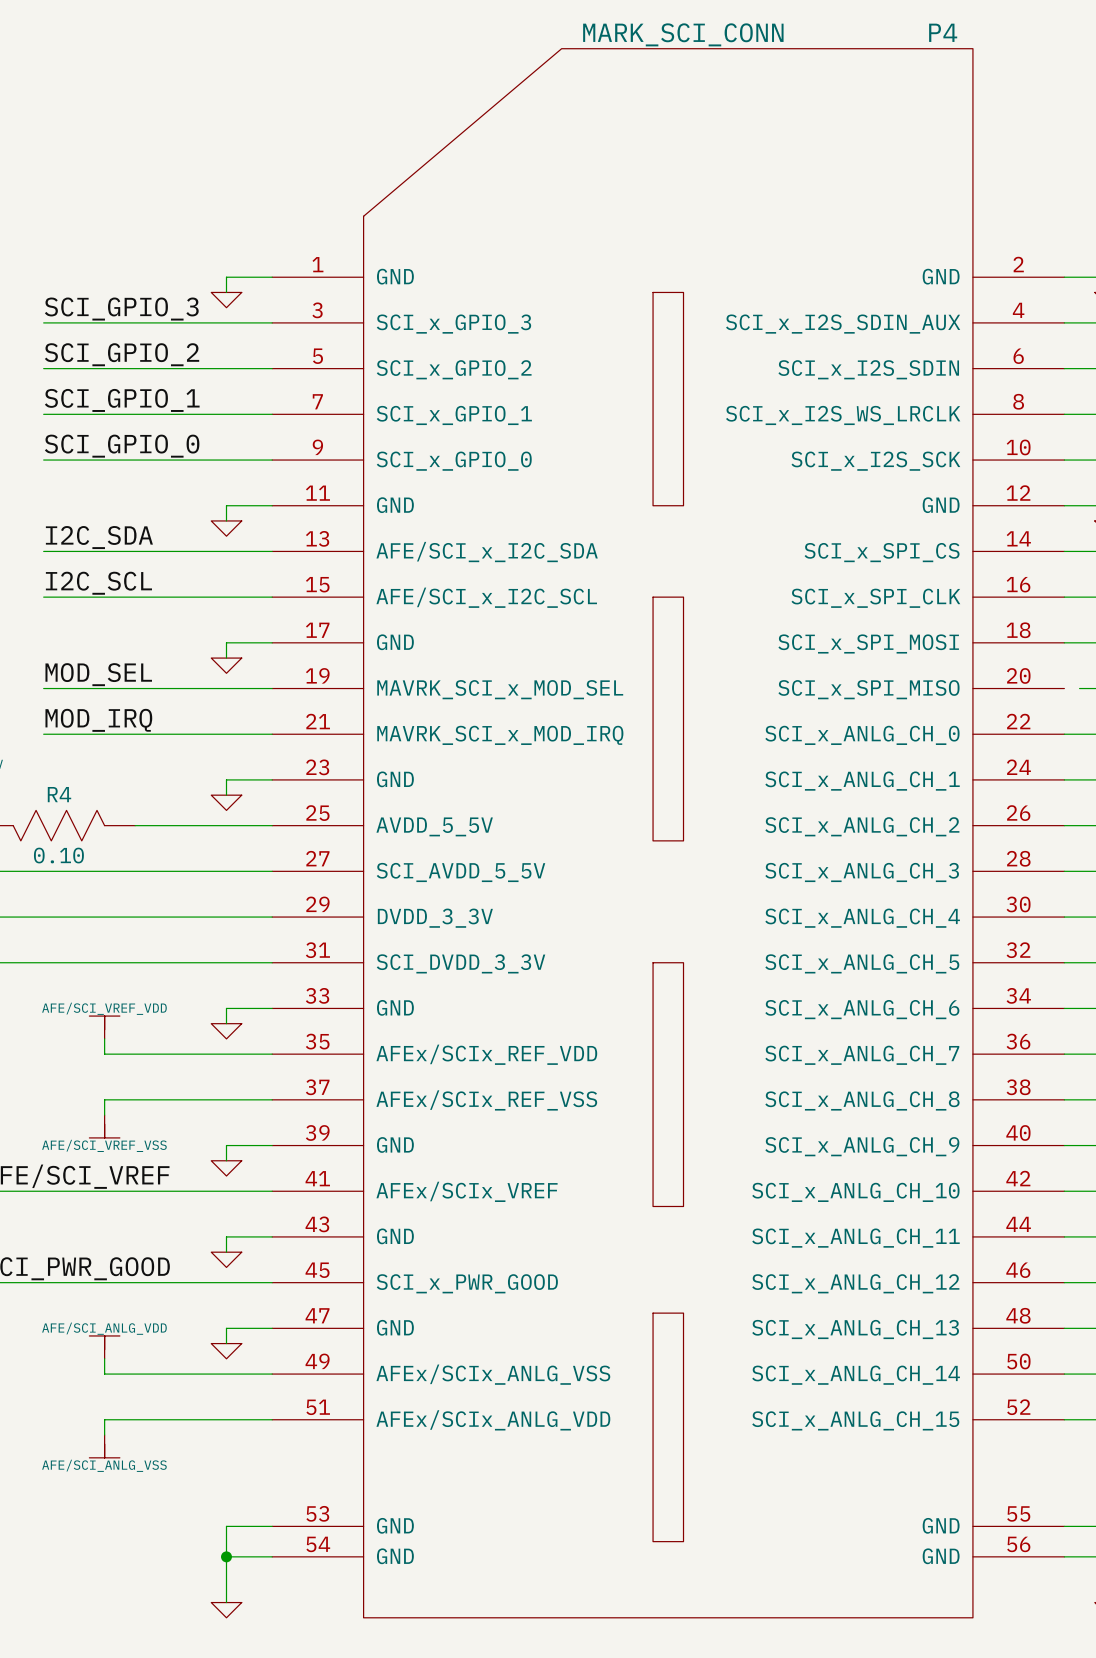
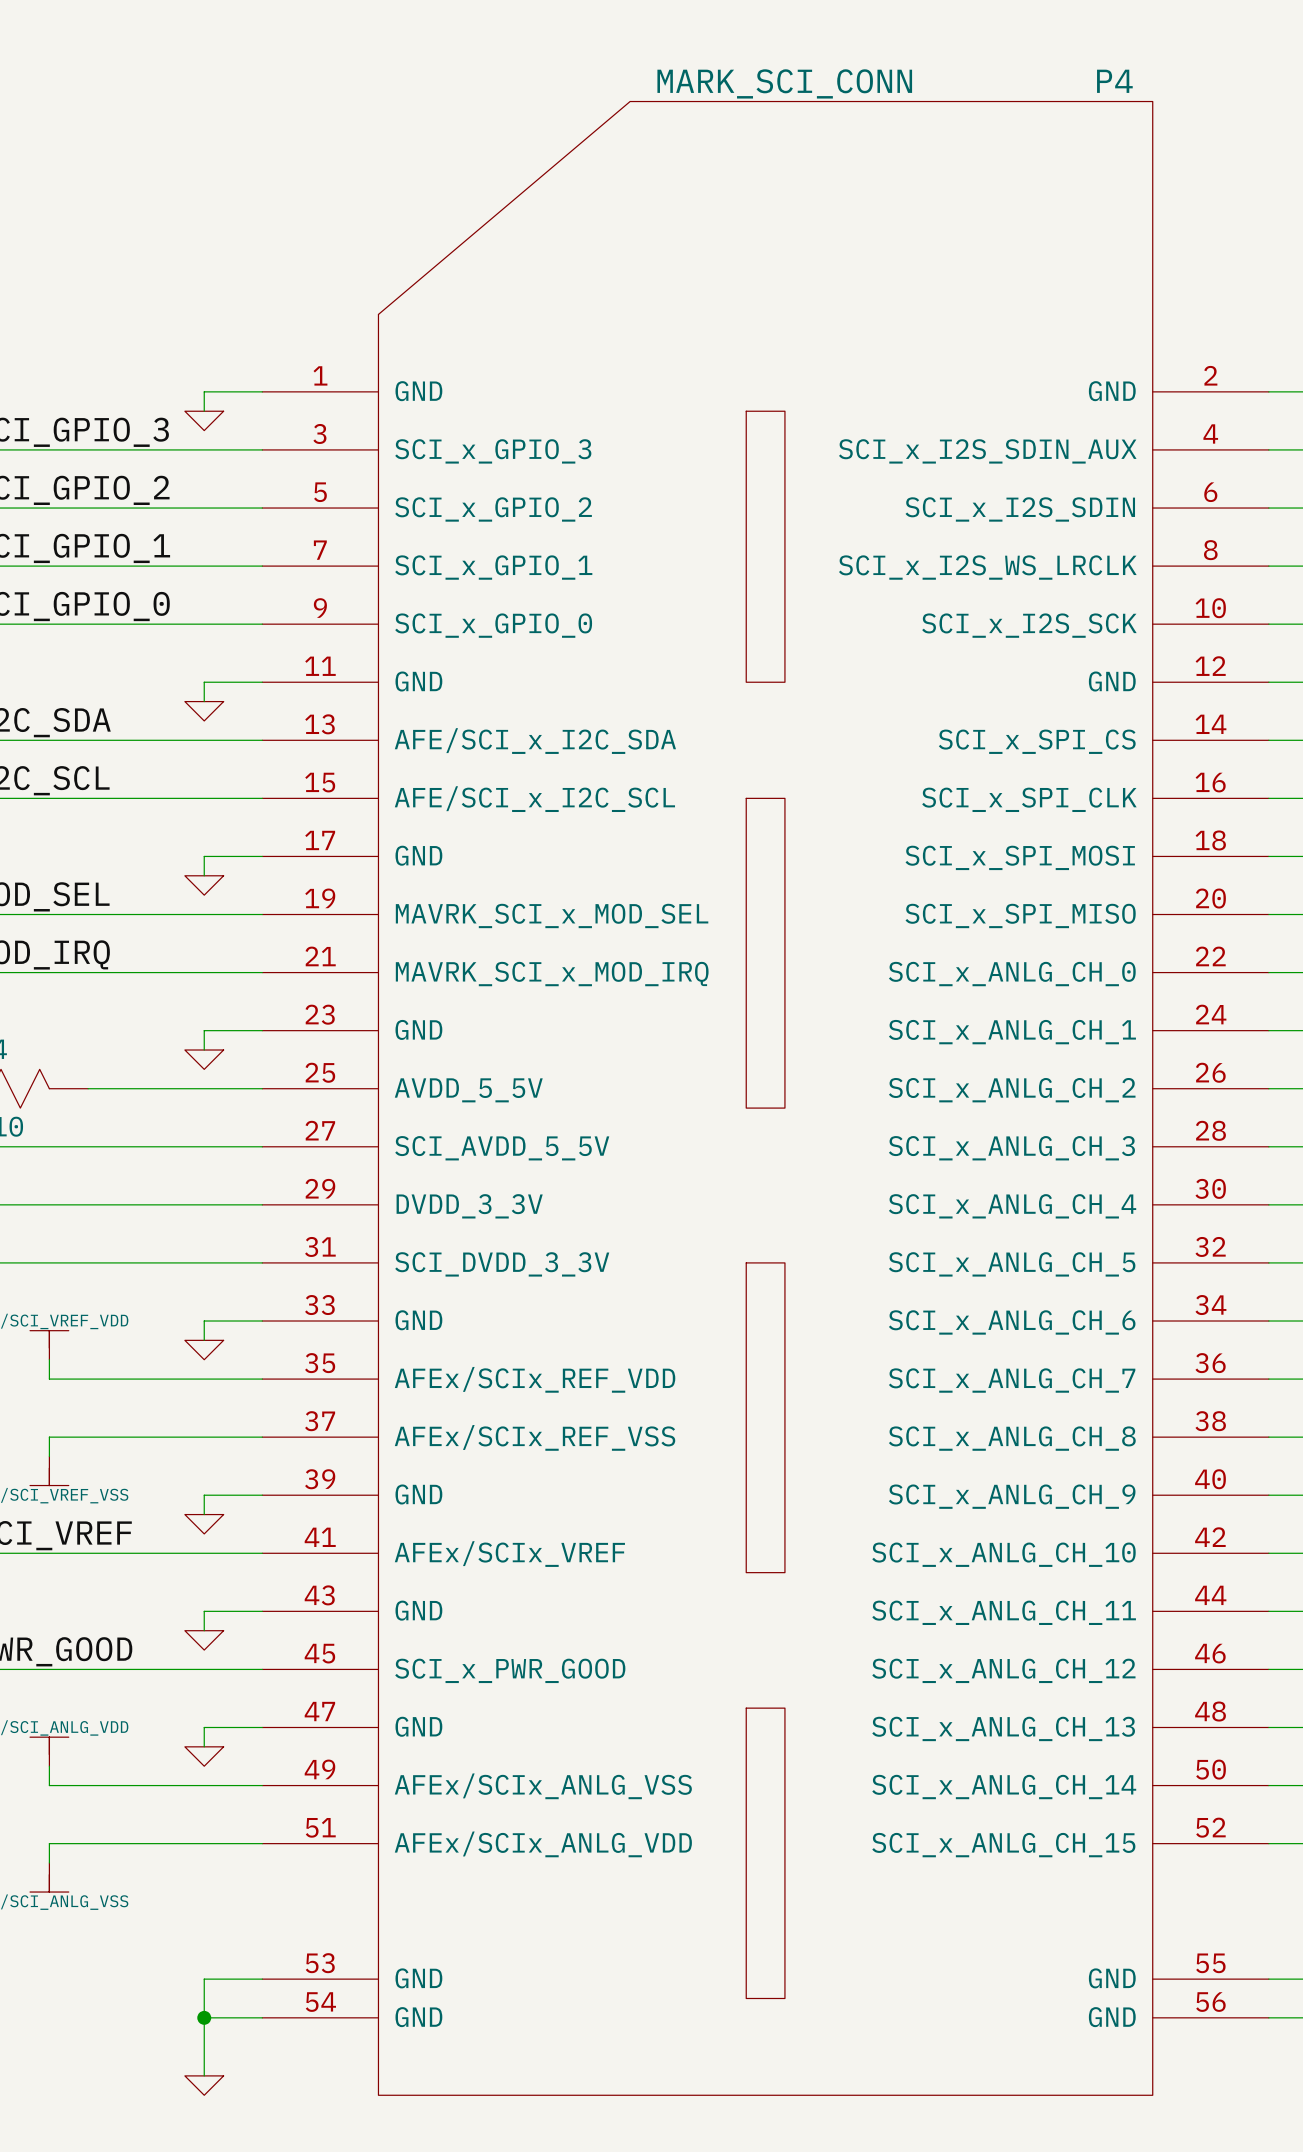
wire: none -> (1268, 914) (1288, 914)

